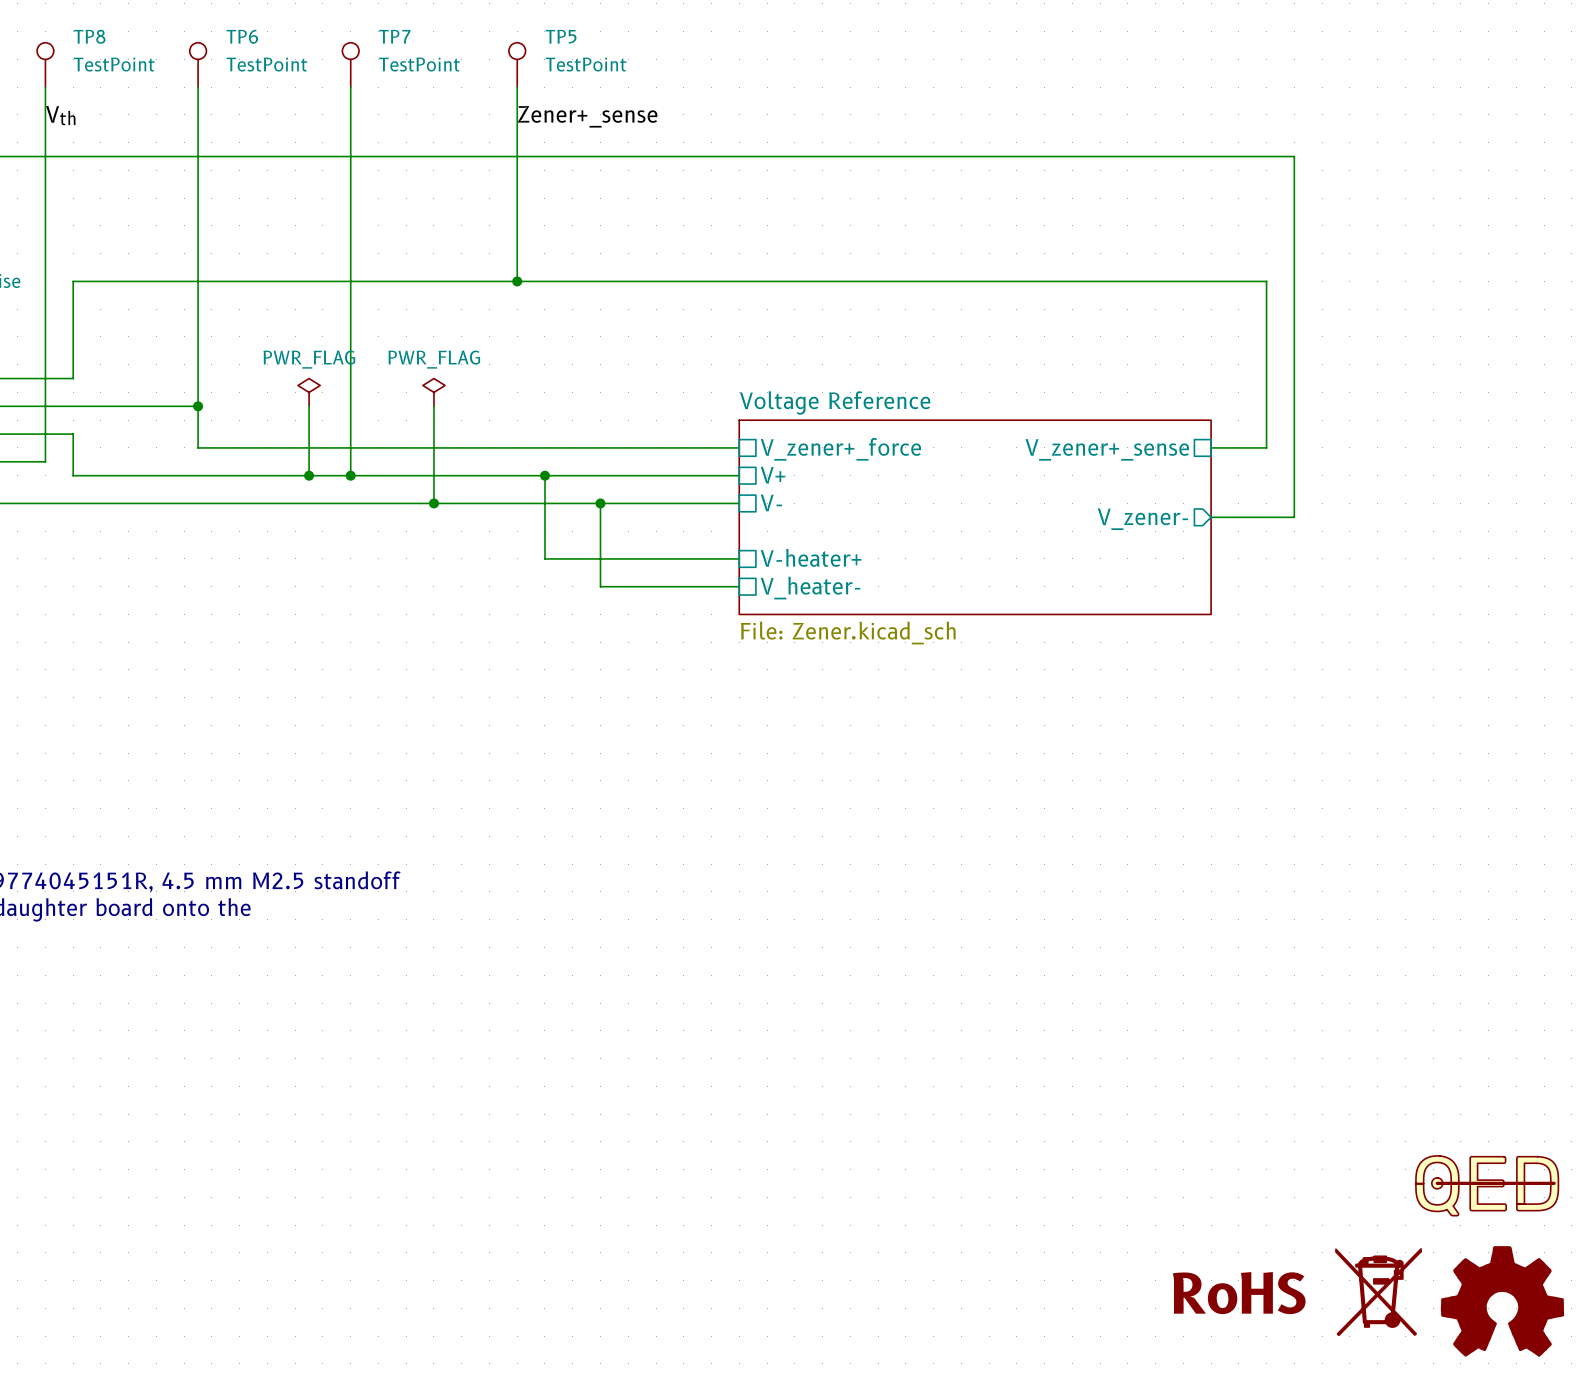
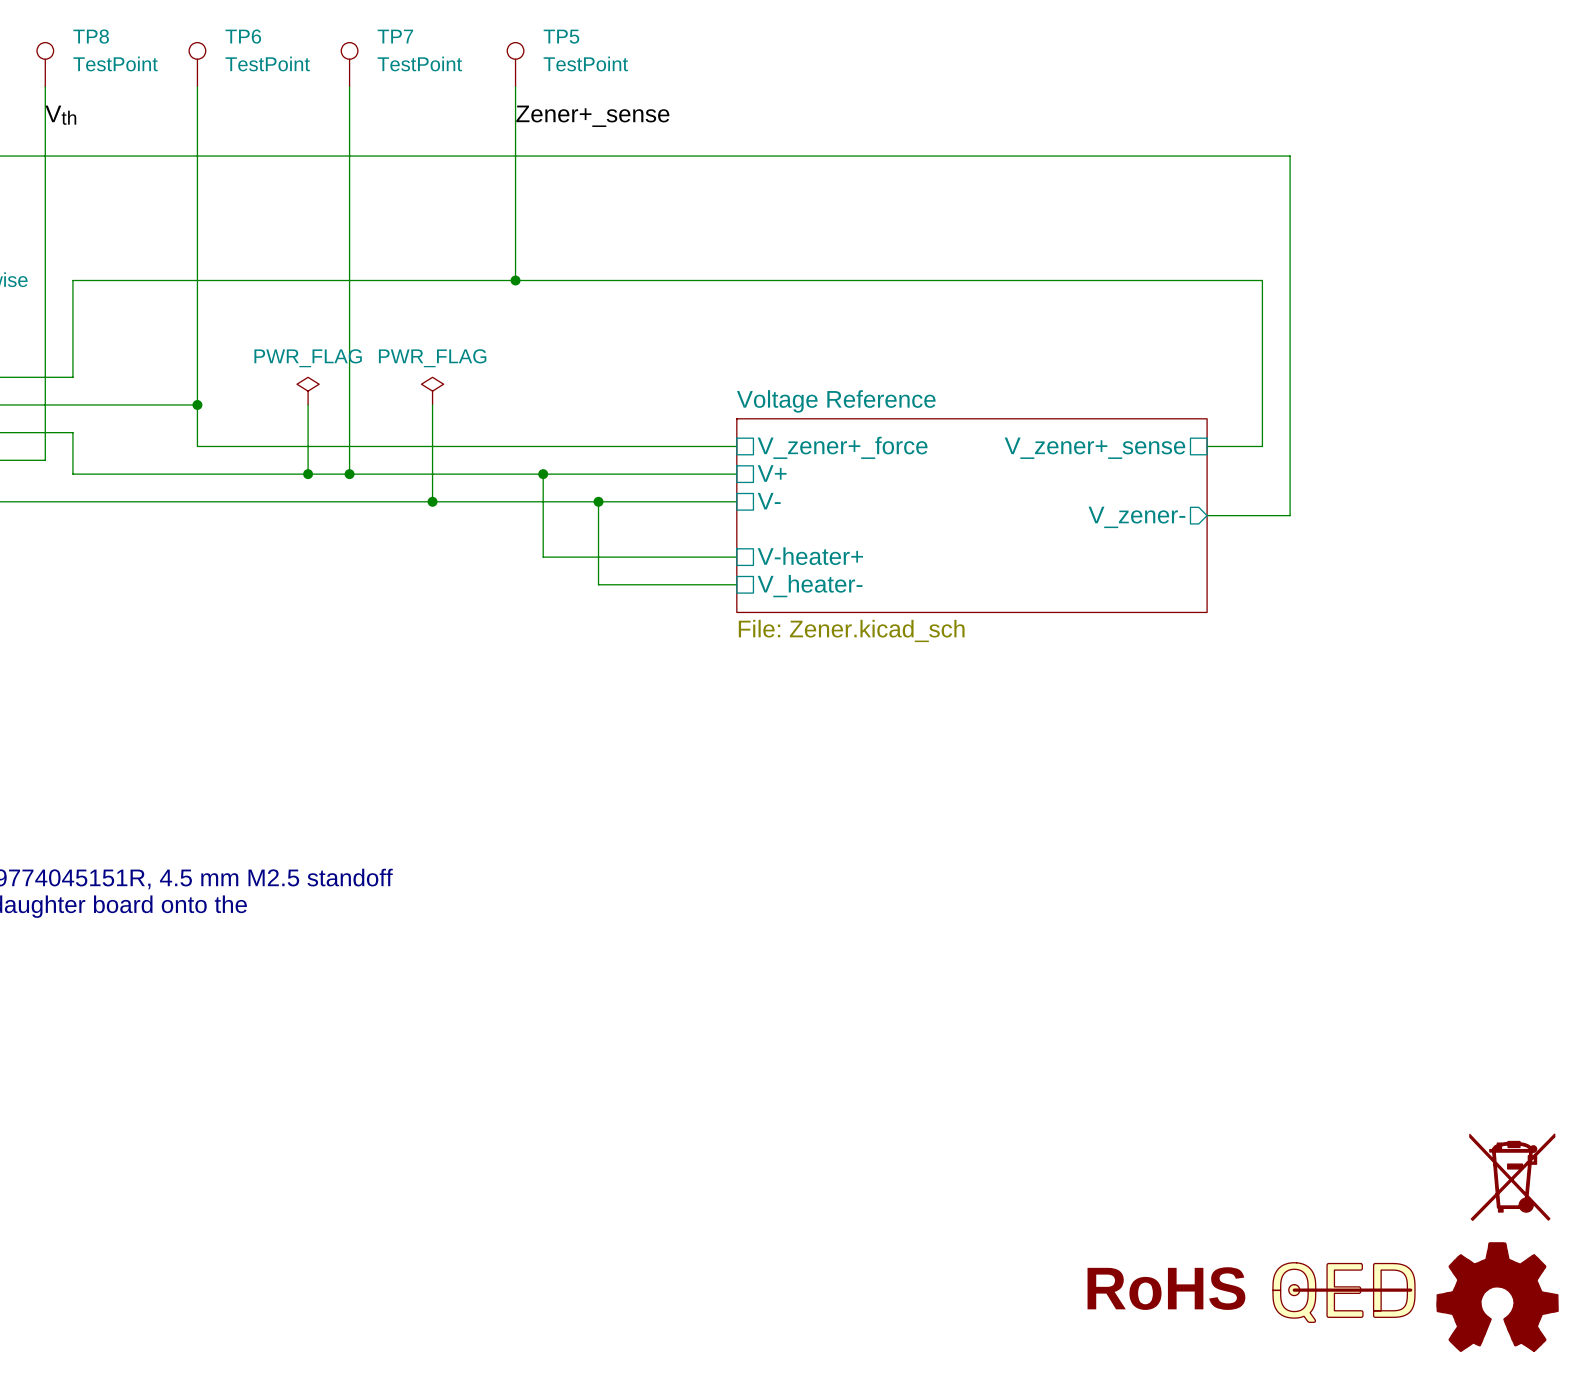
part position: (1487, 1185) -> (1343, 1292)
part position: (1378, 1292) -> (1512, 1177)
power symbol position: (1239, 1293) -> (1166, 1288)

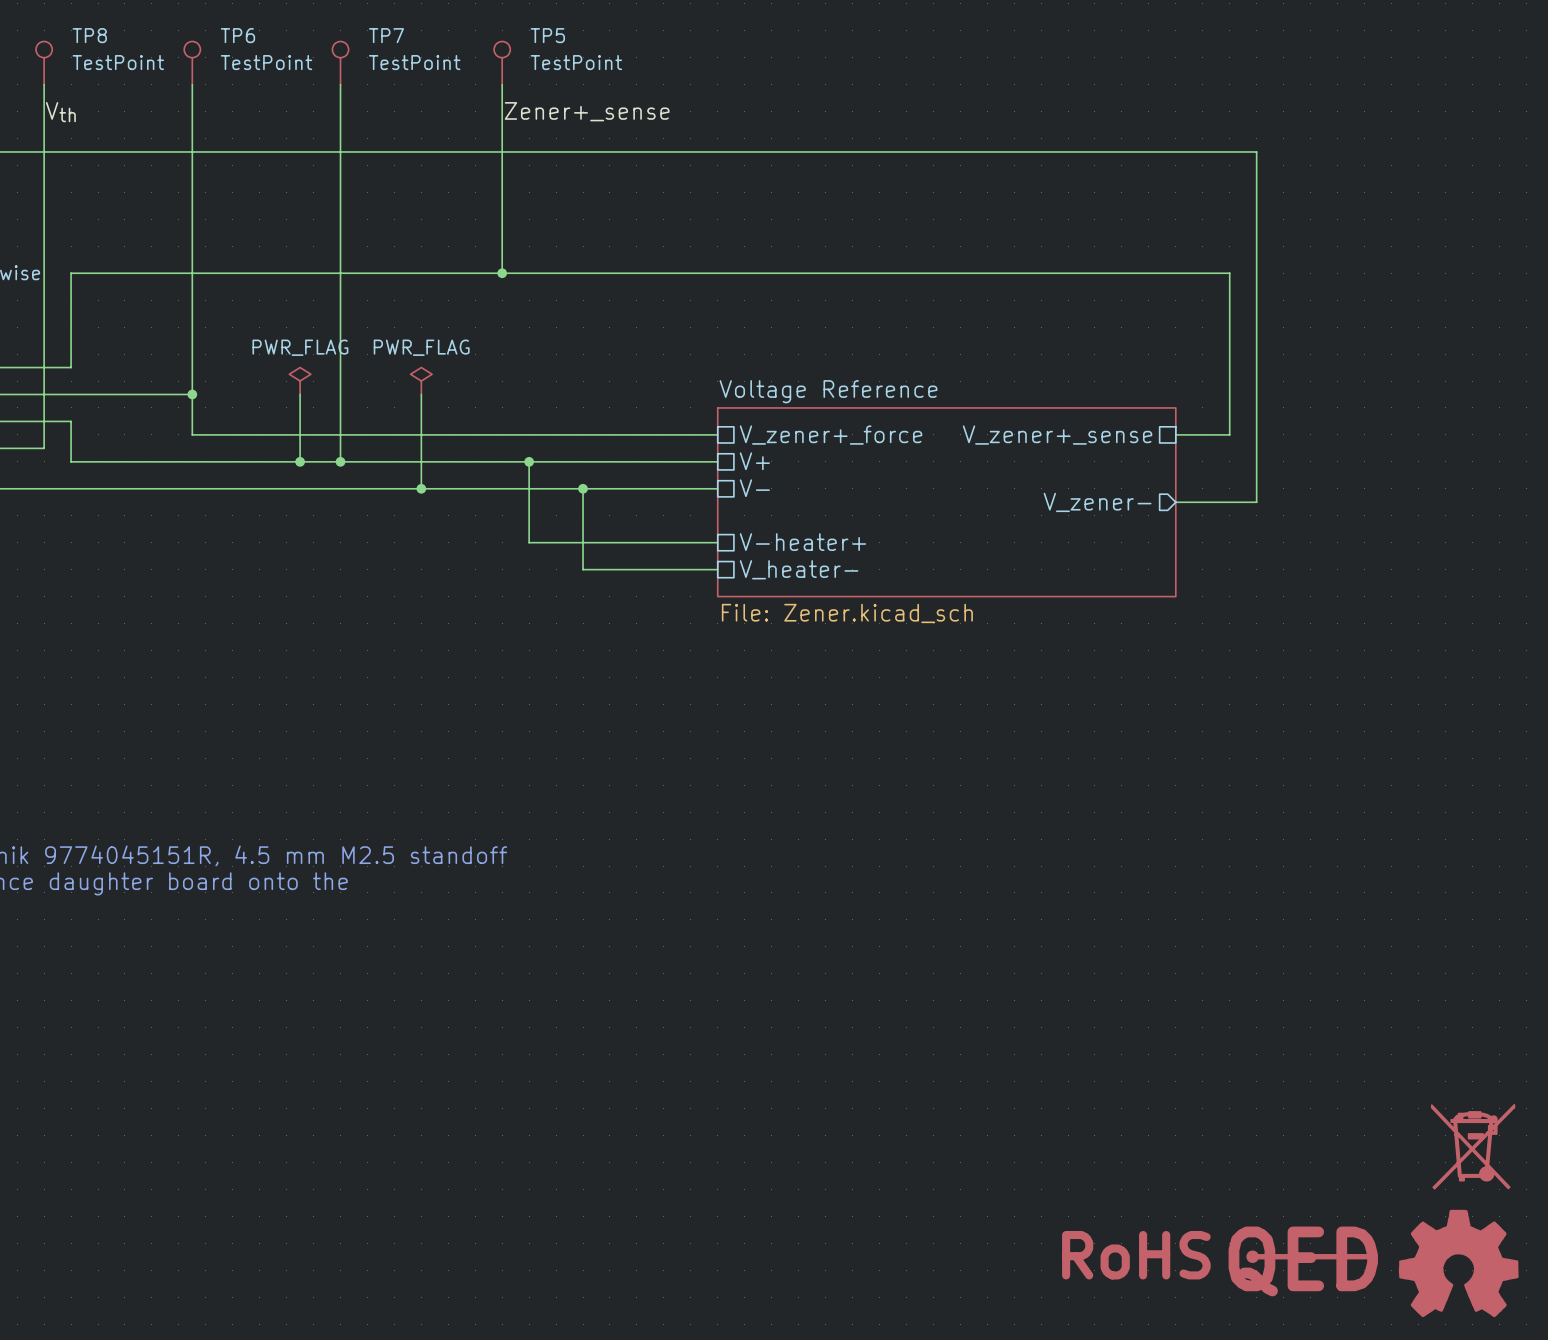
part symbol: [1272, 1262, 1415, 1323] -> [1247, 1251, 1371, 1263]

